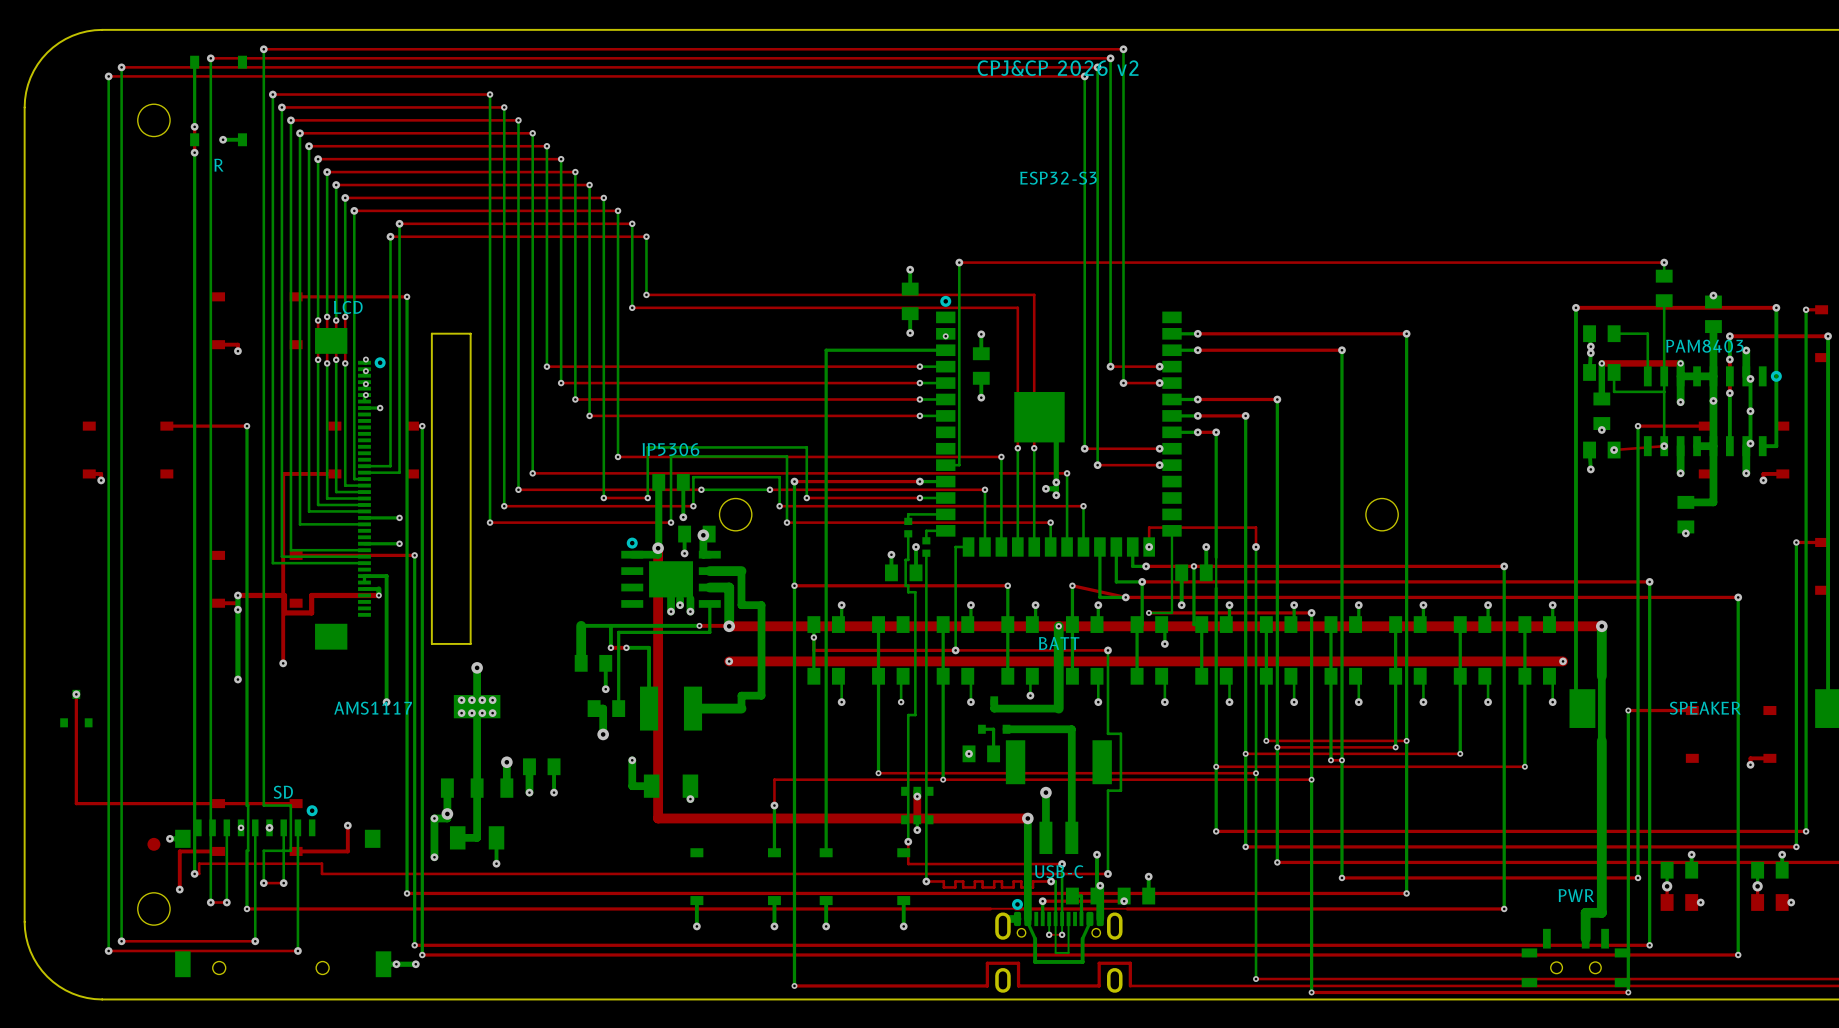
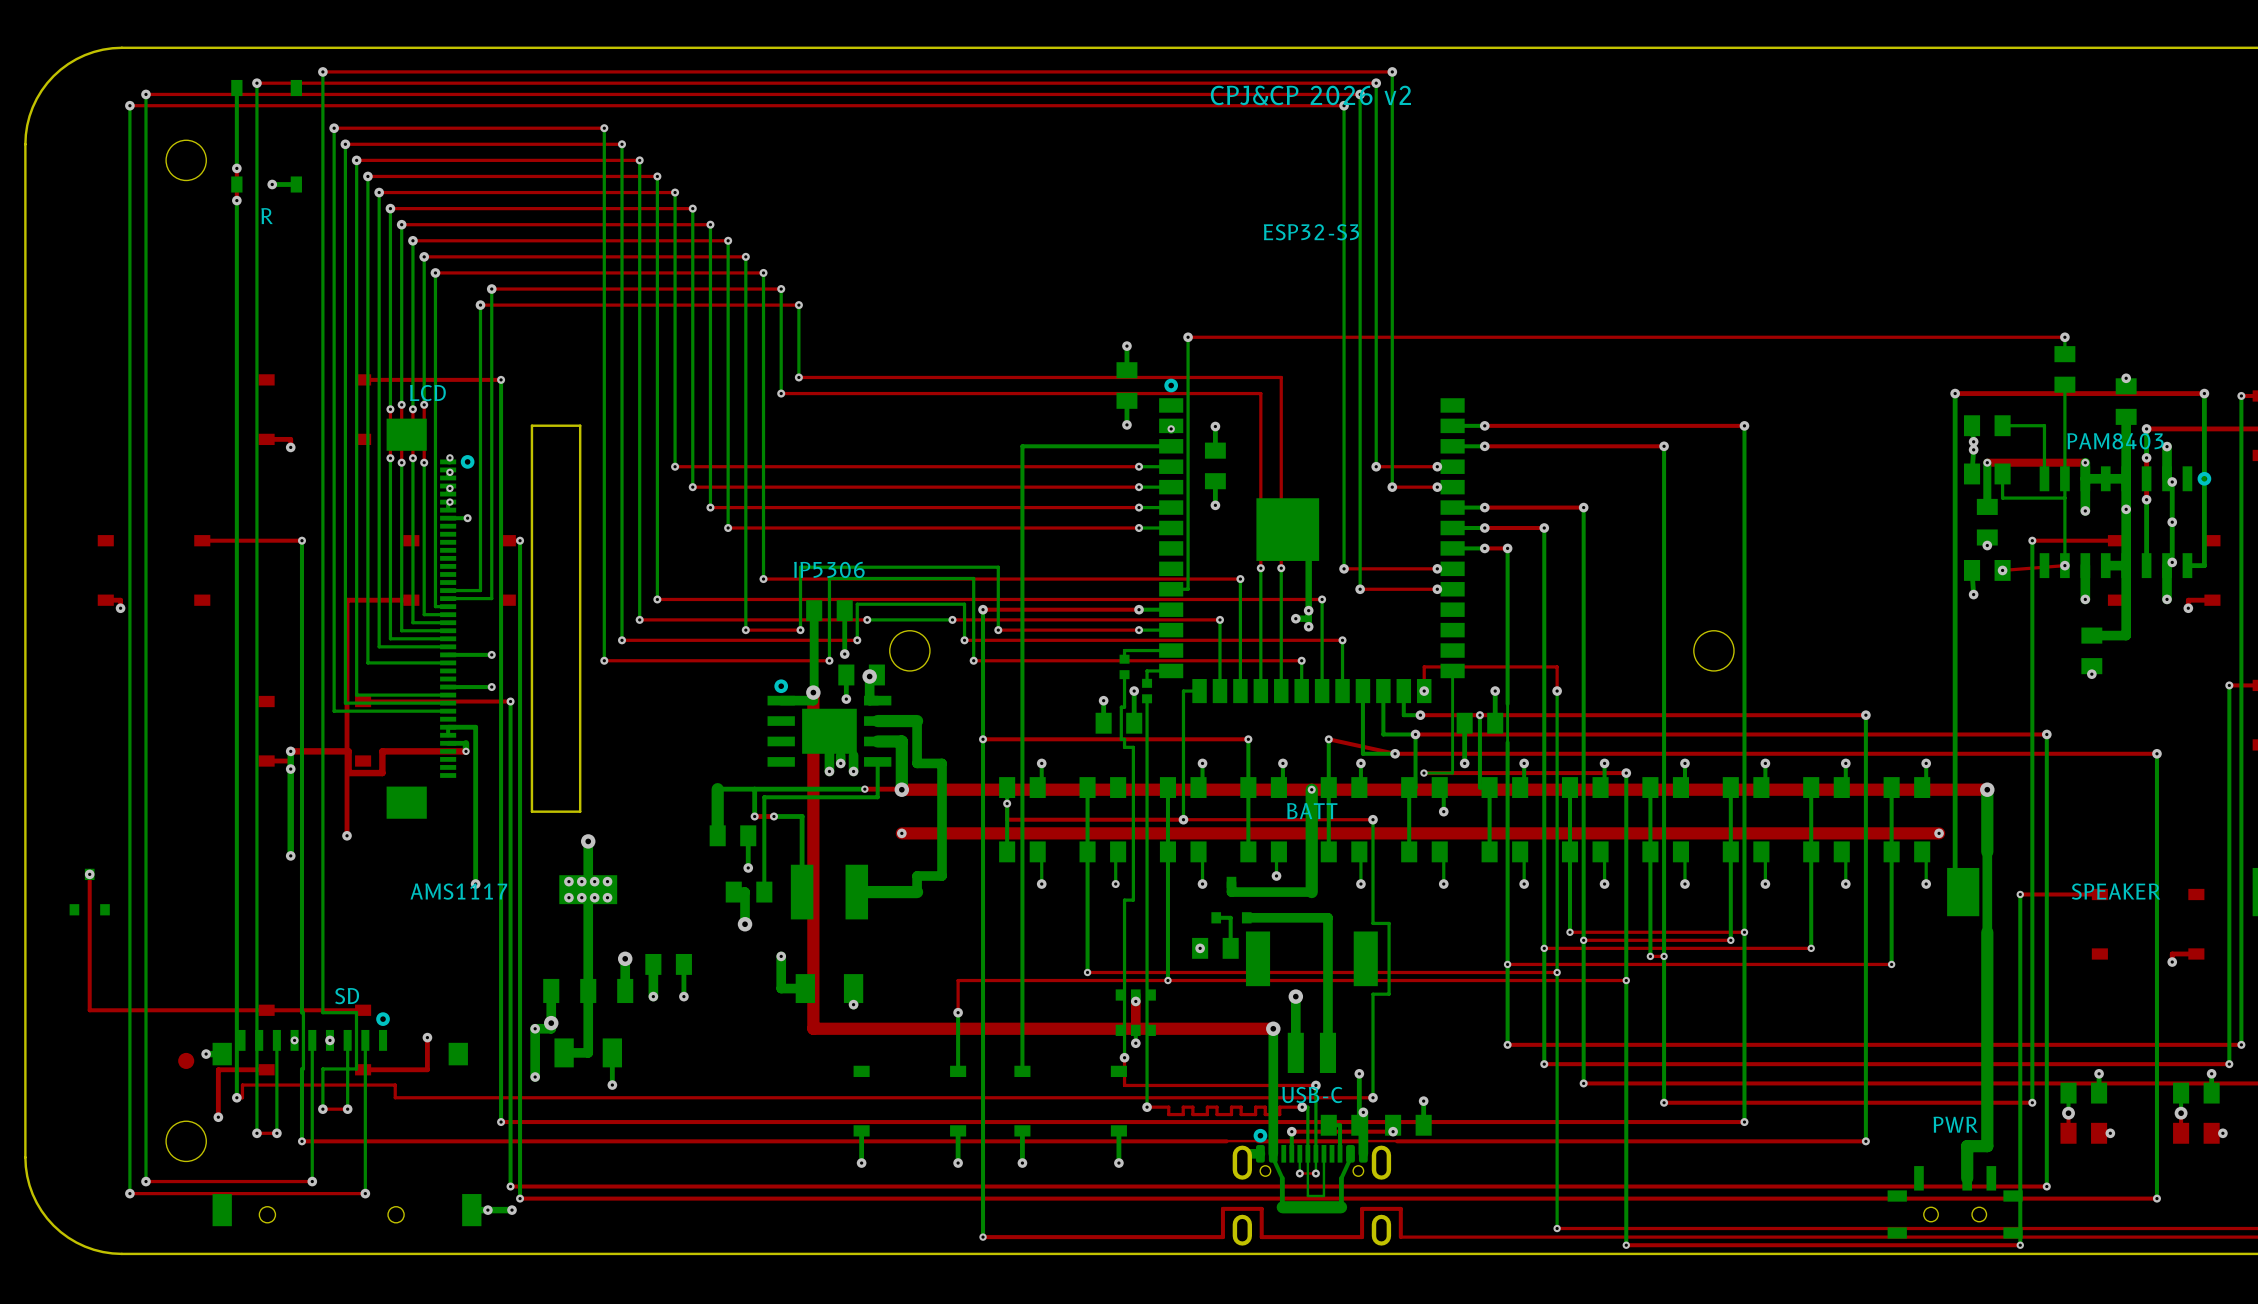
bottom track width: thin (1082, 961) (1035, 961) -> thick (1341, 1207) (1282, 1207)

